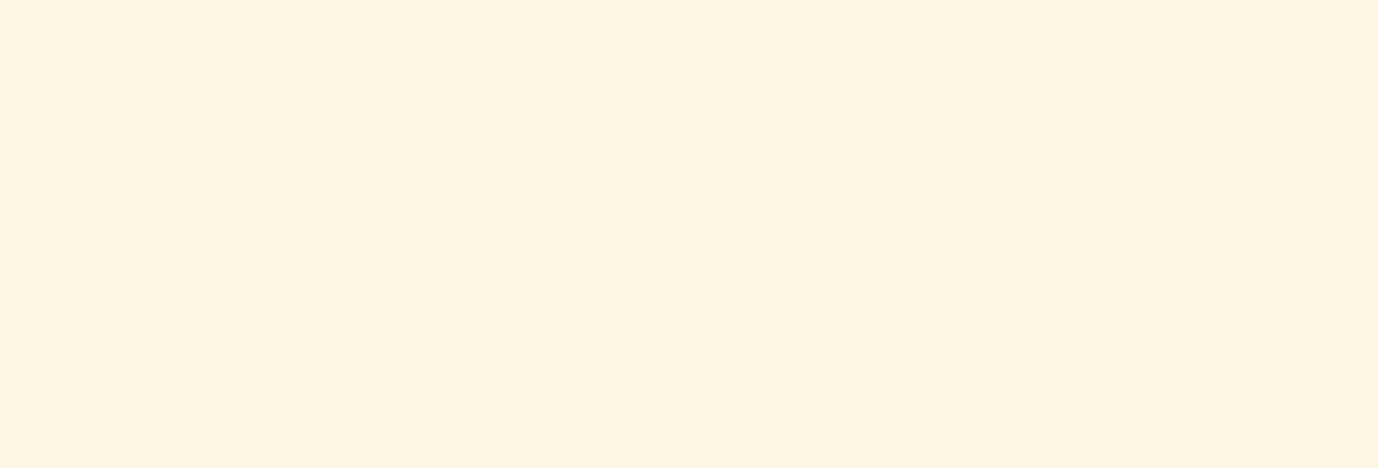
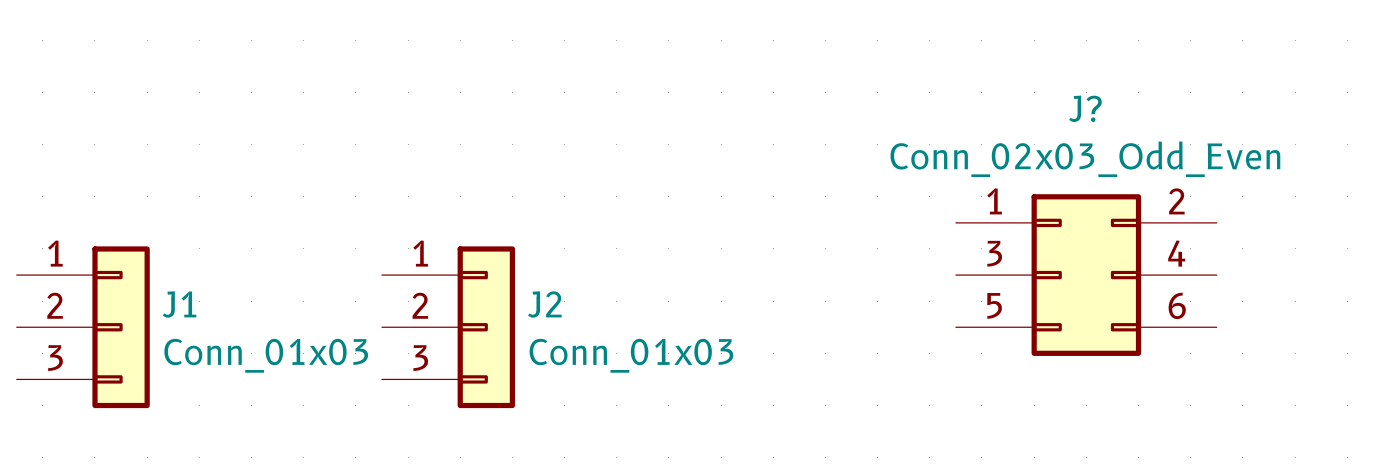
J?: none -> Conn_02x03_Odd_Even (1086, 275)
J1: none -> Conn_01x03 (83, 327)
J2: none -> Conn_01x03 (448, 327)

